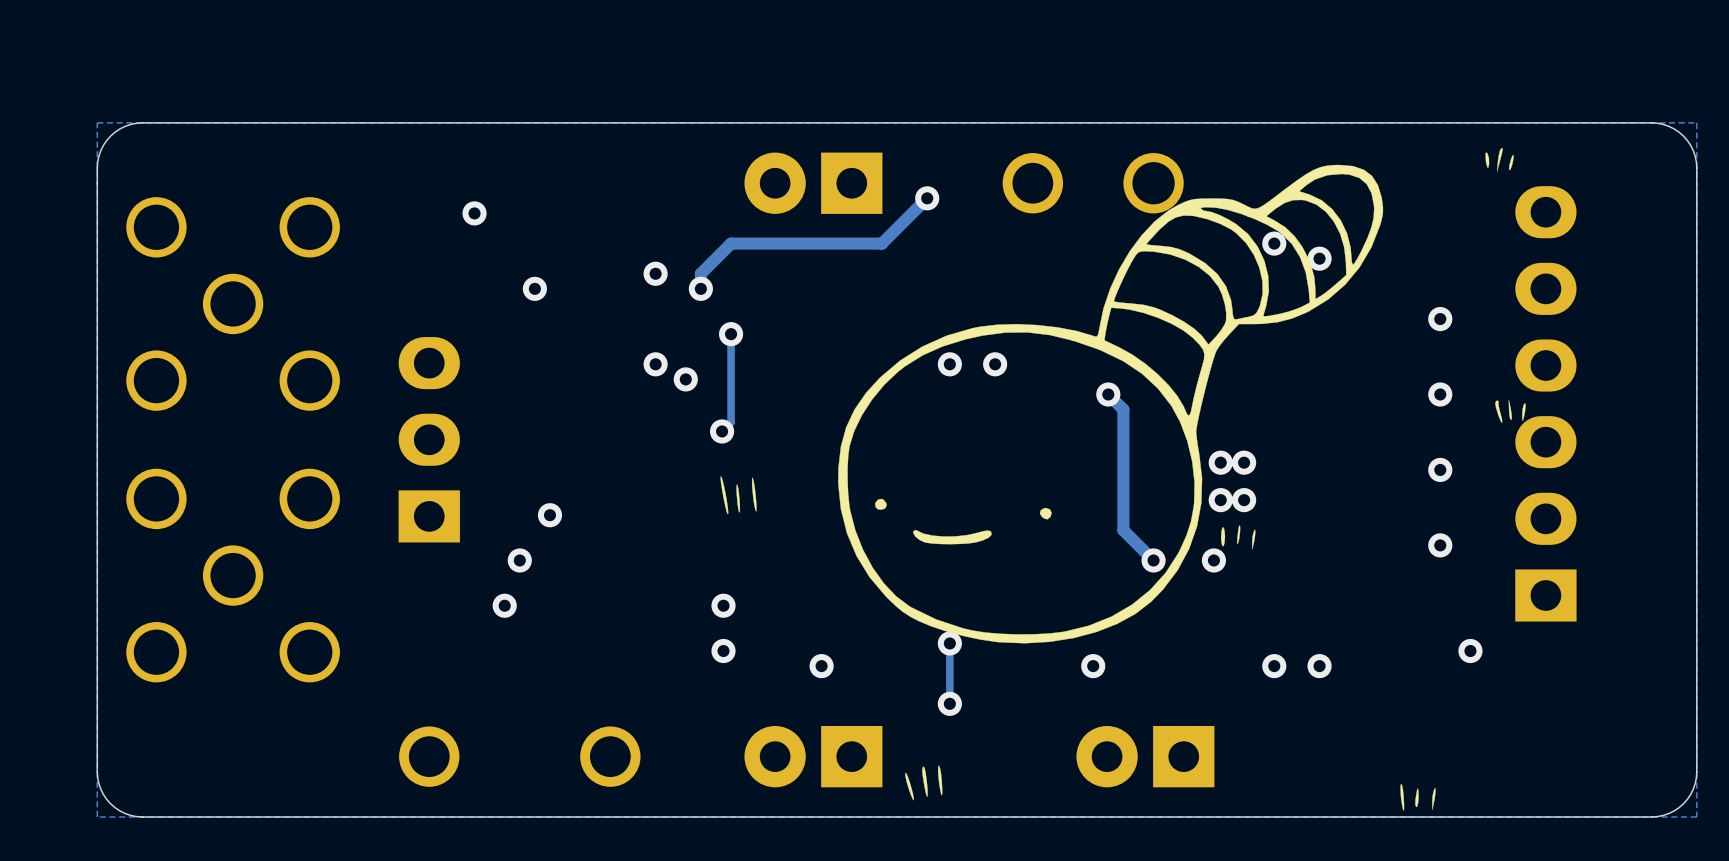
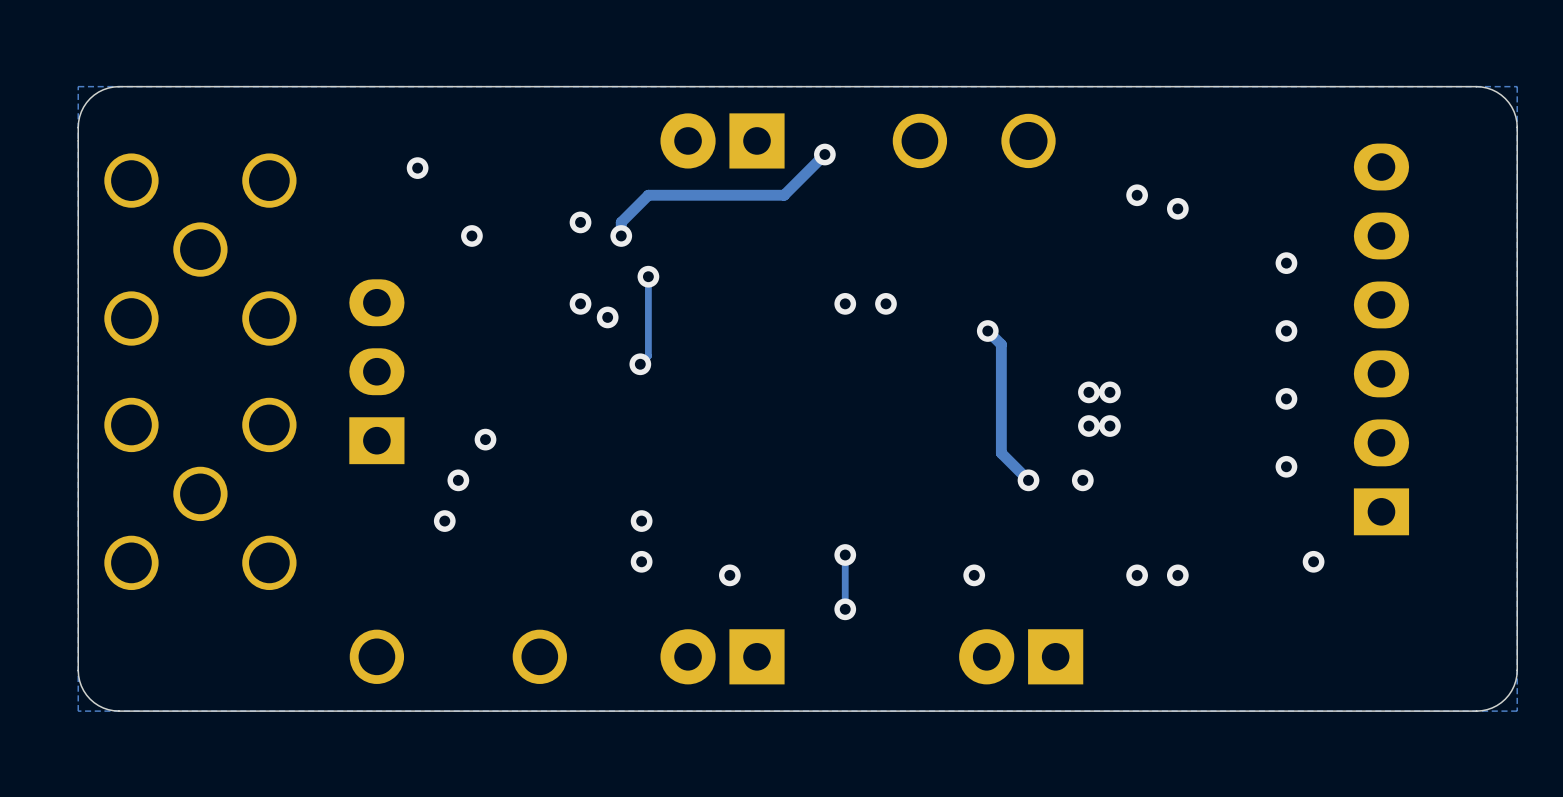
drawing: [720, 147, 1526, 811] -> none

